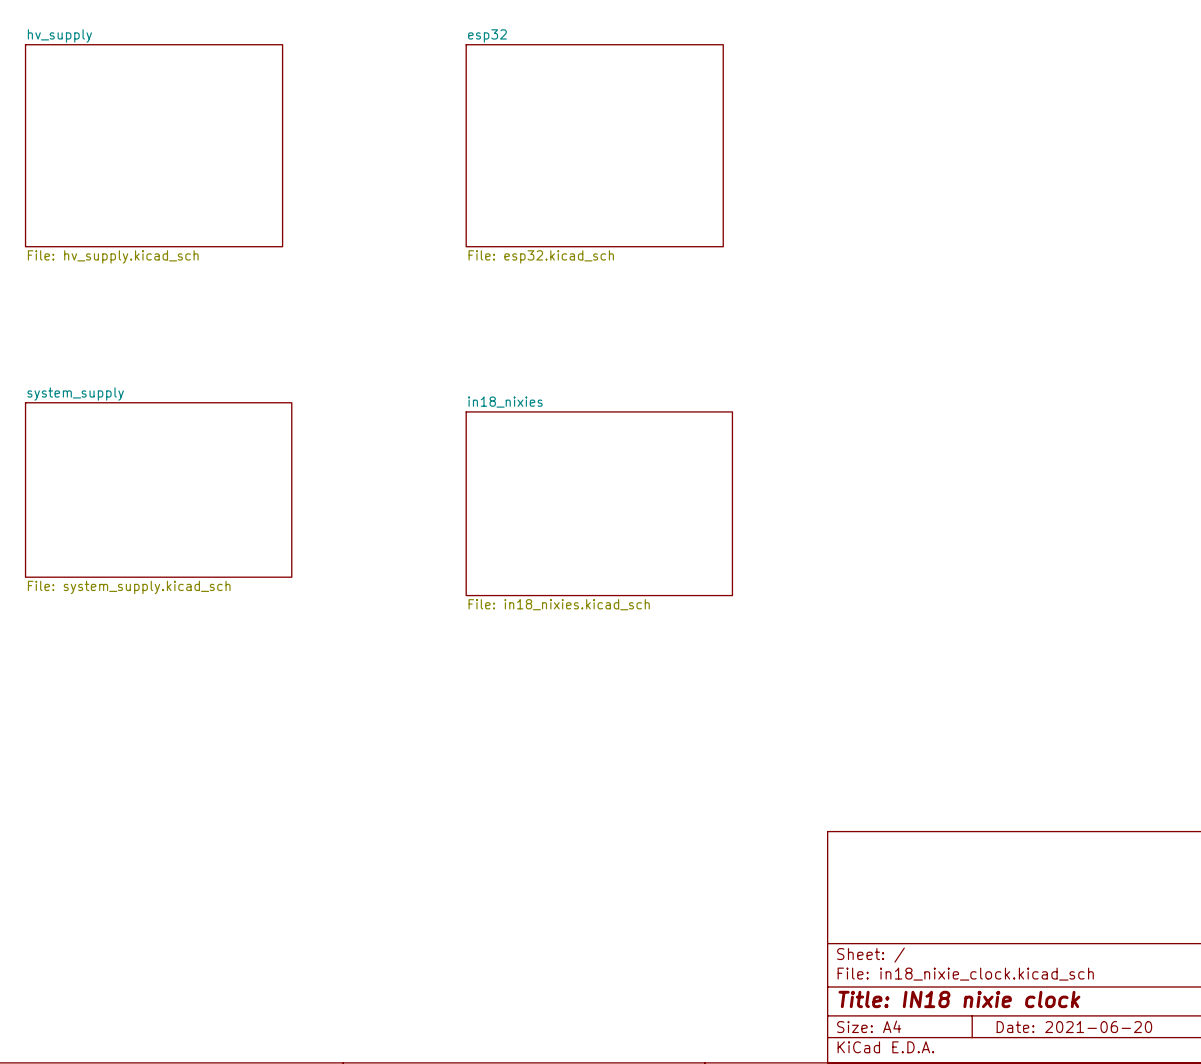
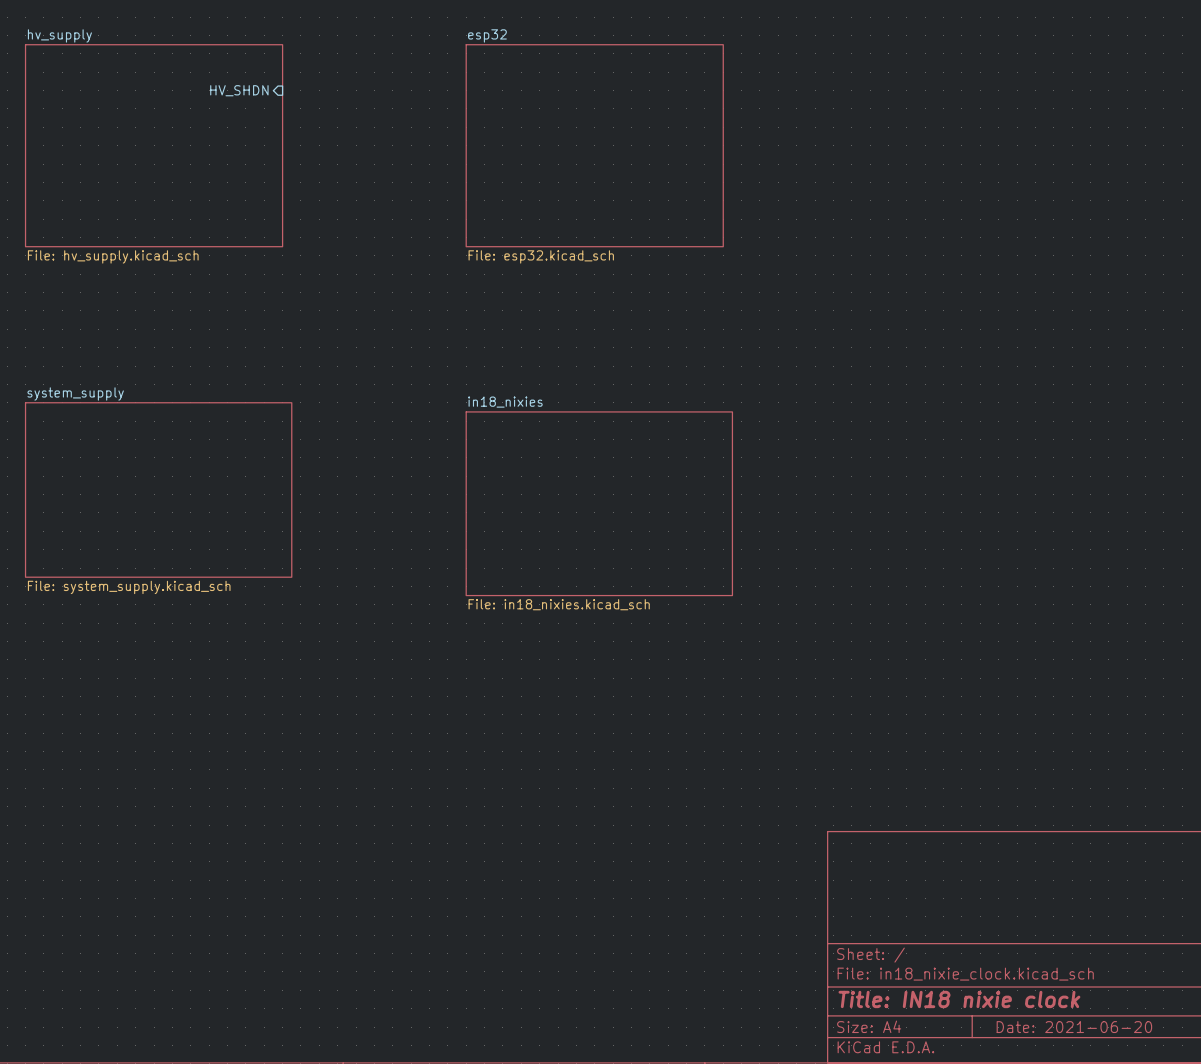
sheet pin: none -> HV_SHDN (239, 90)

